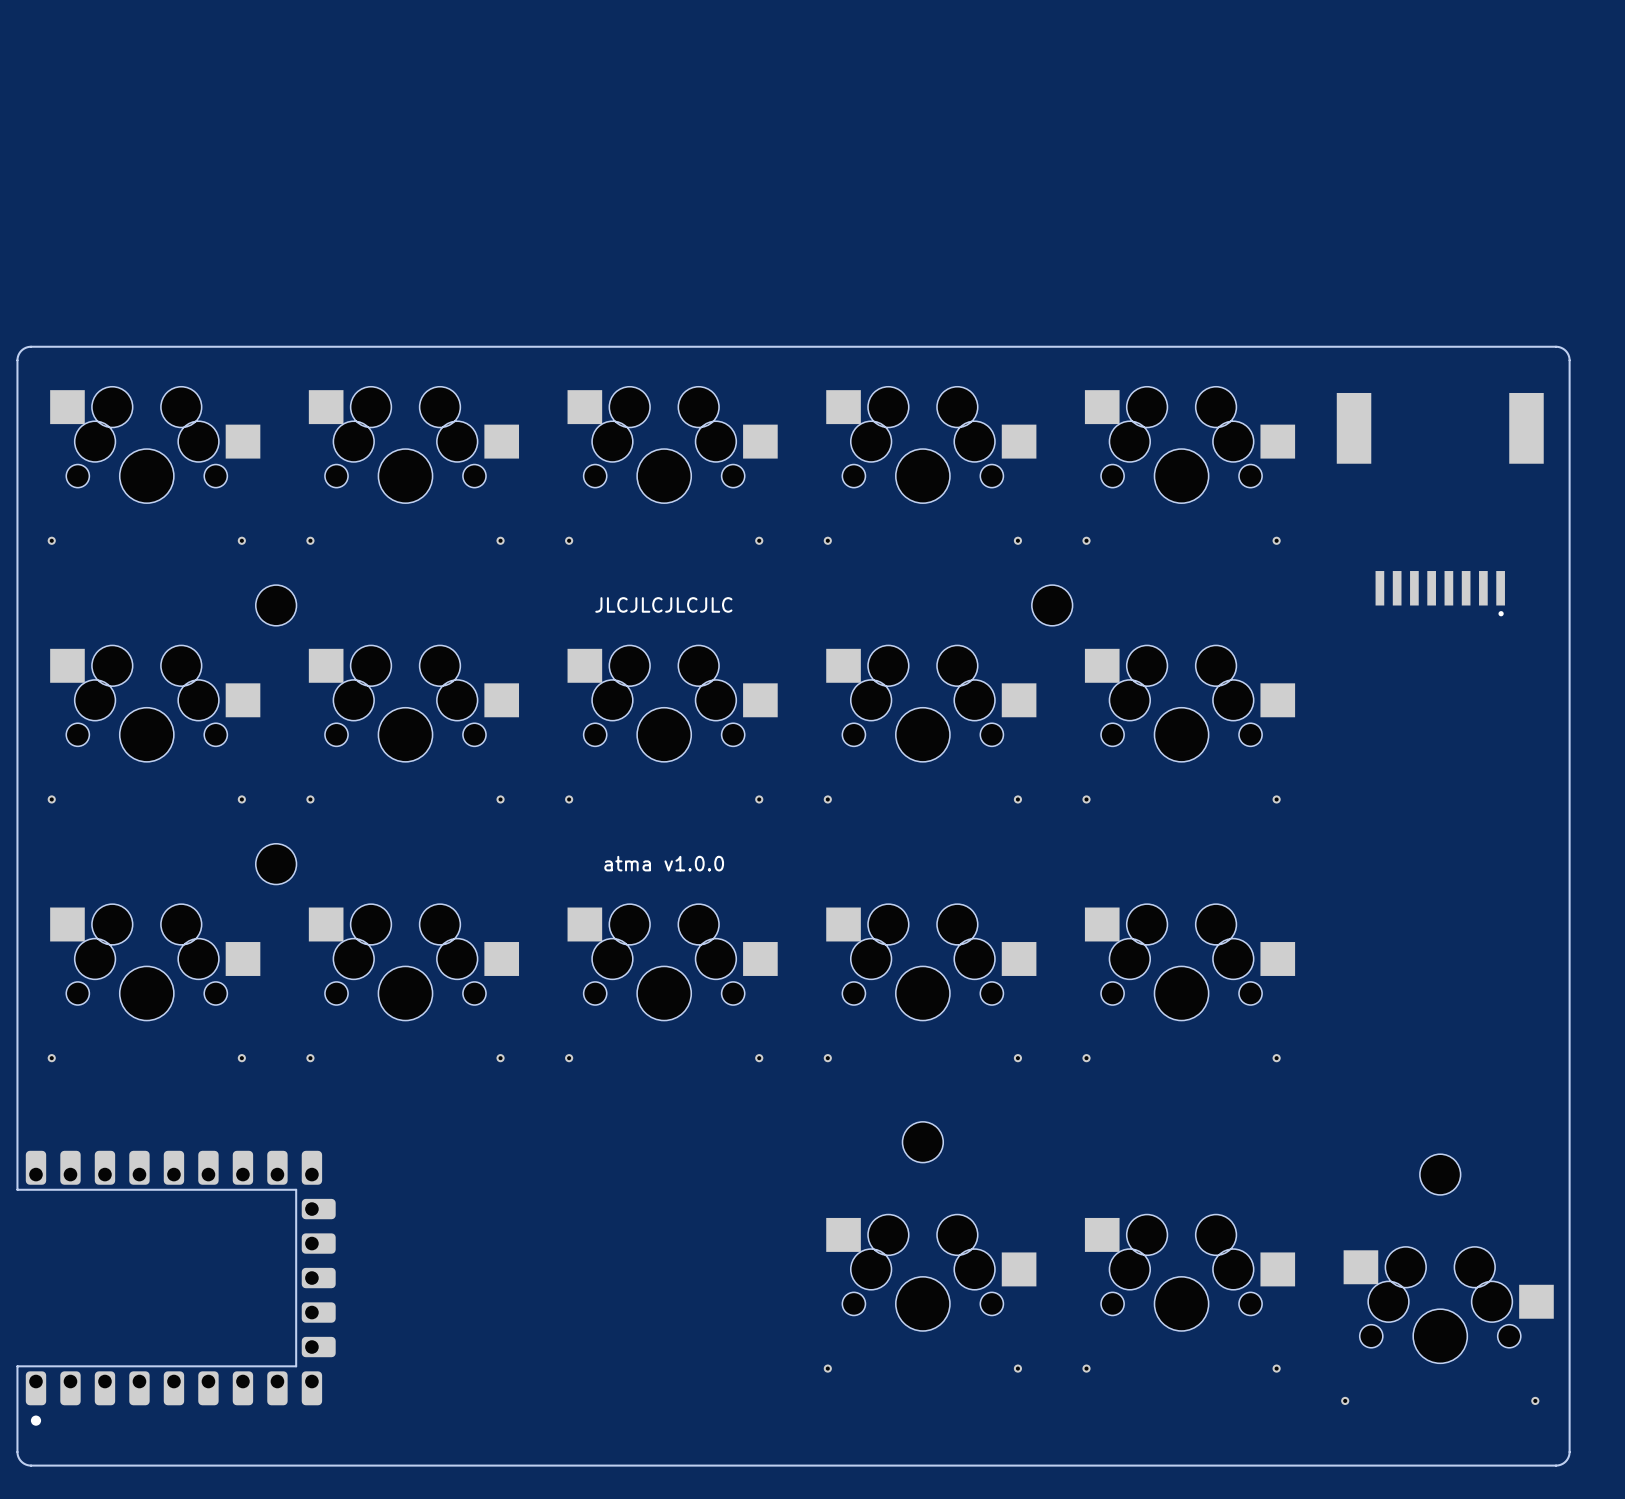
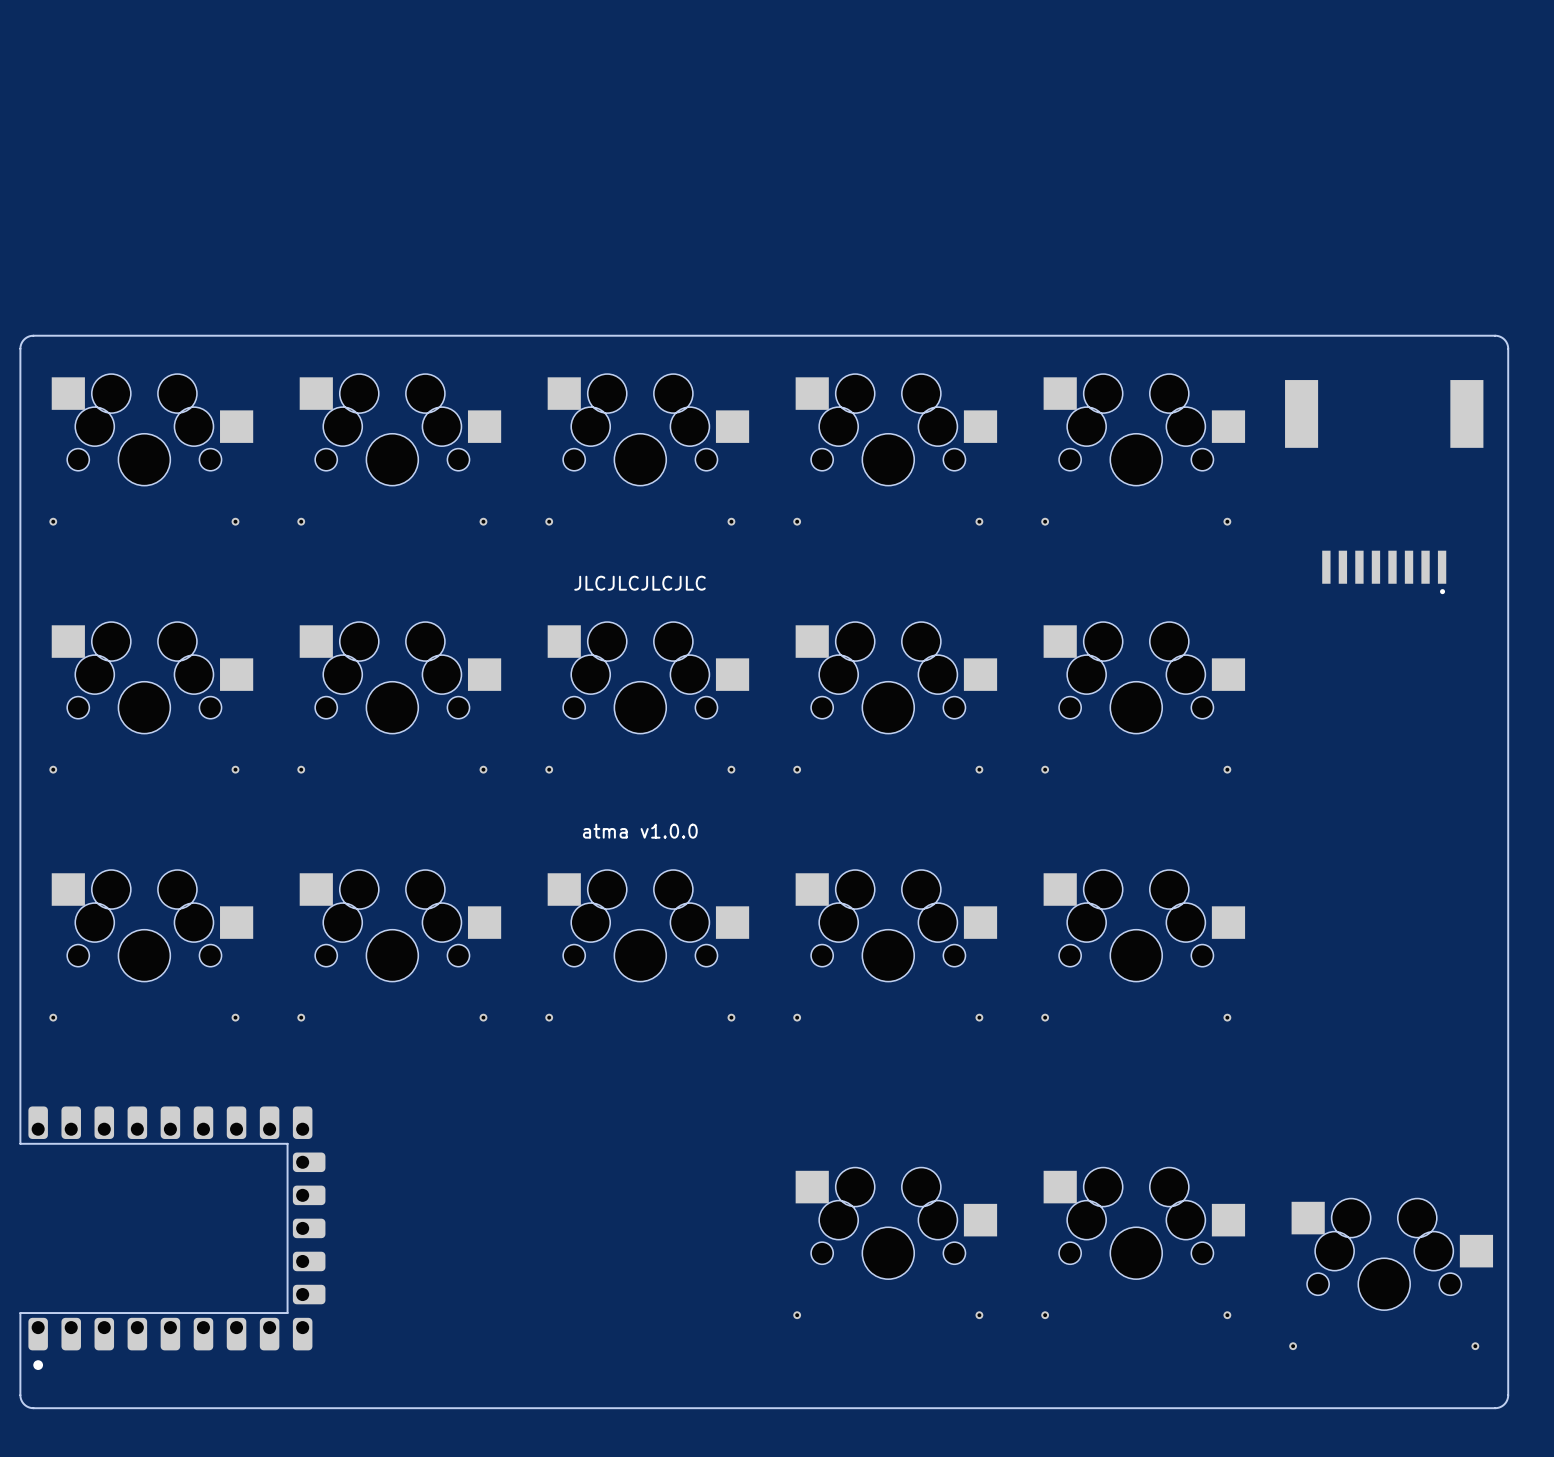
part: (276, 605) -> none
part: (1052, 605) -> none
part: (276, 864) -> none
part: (922, 1142) -> none
part: (1440, 1174) -> none

